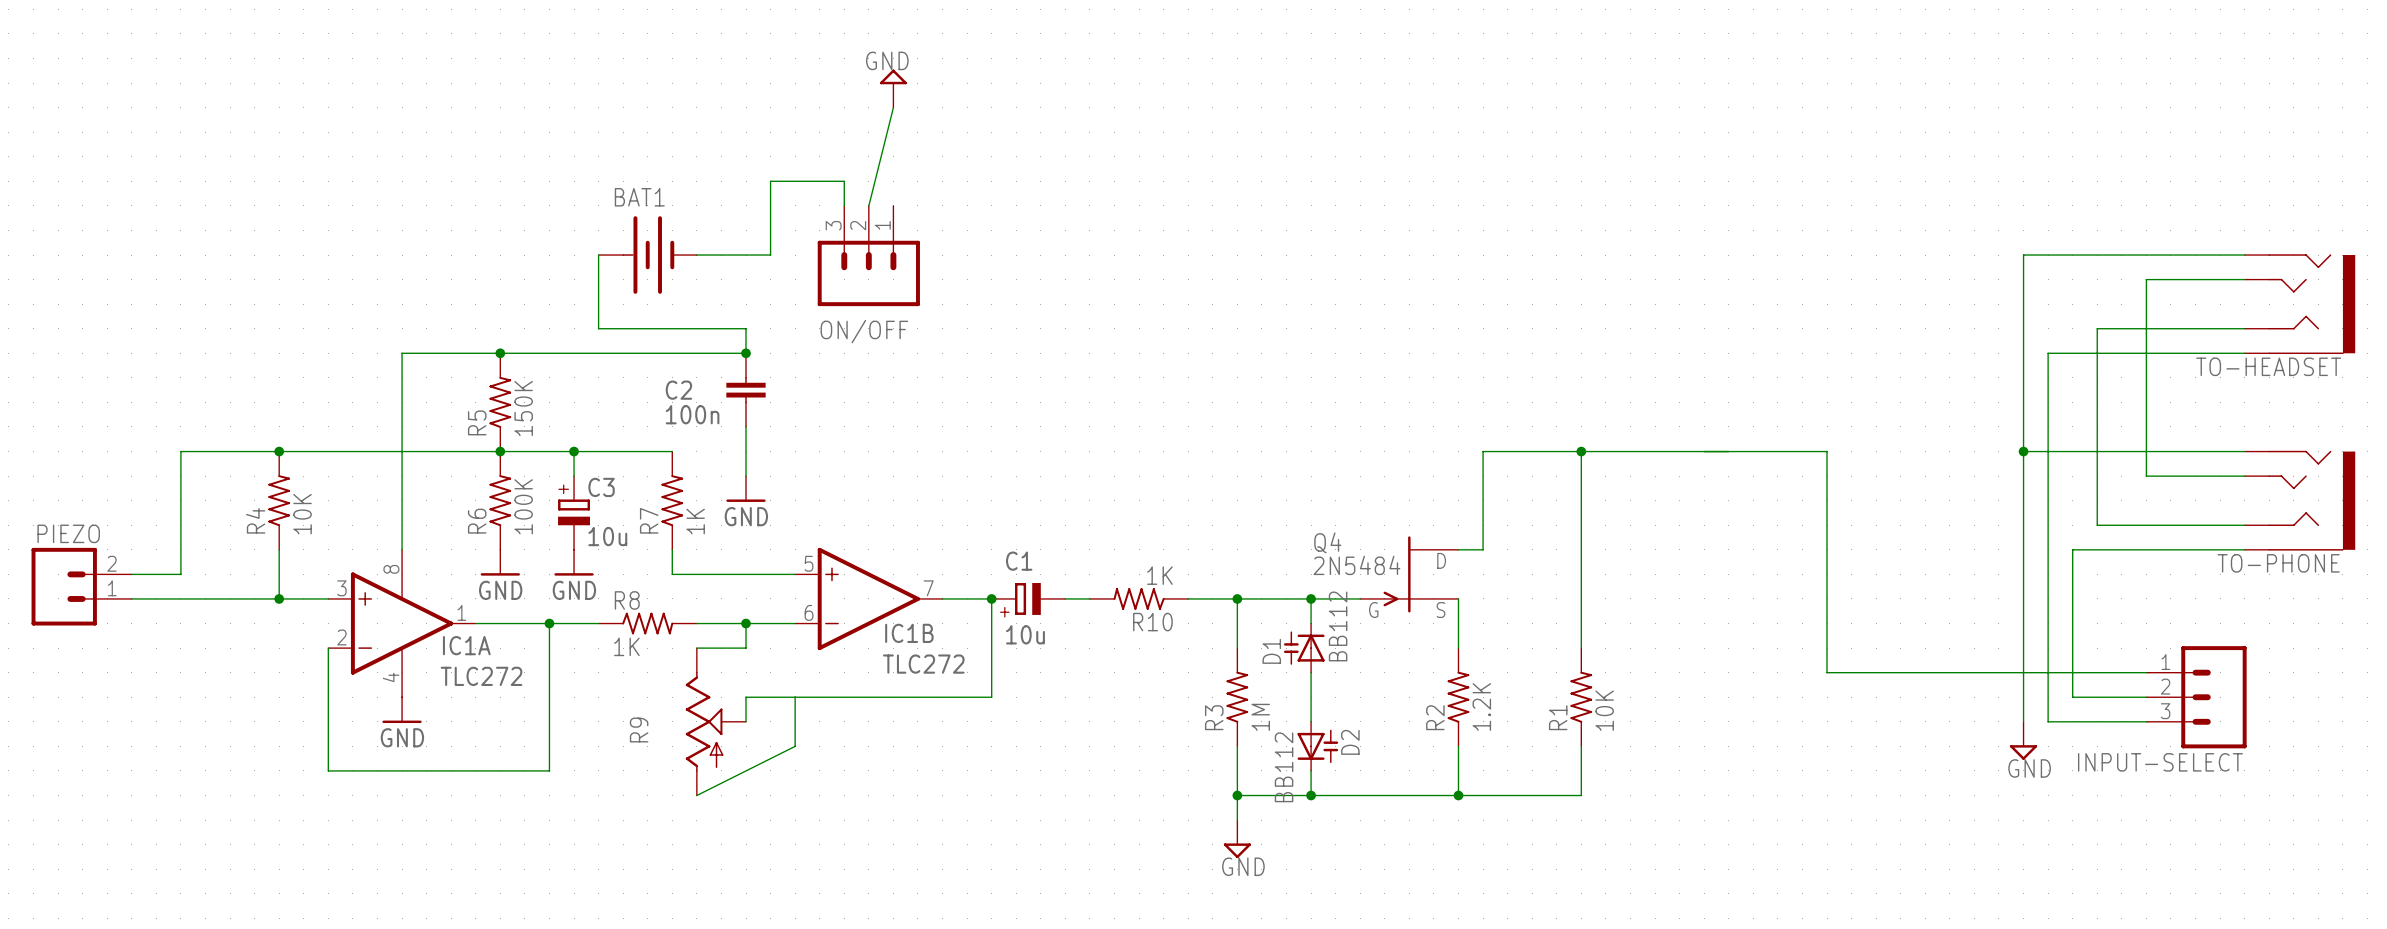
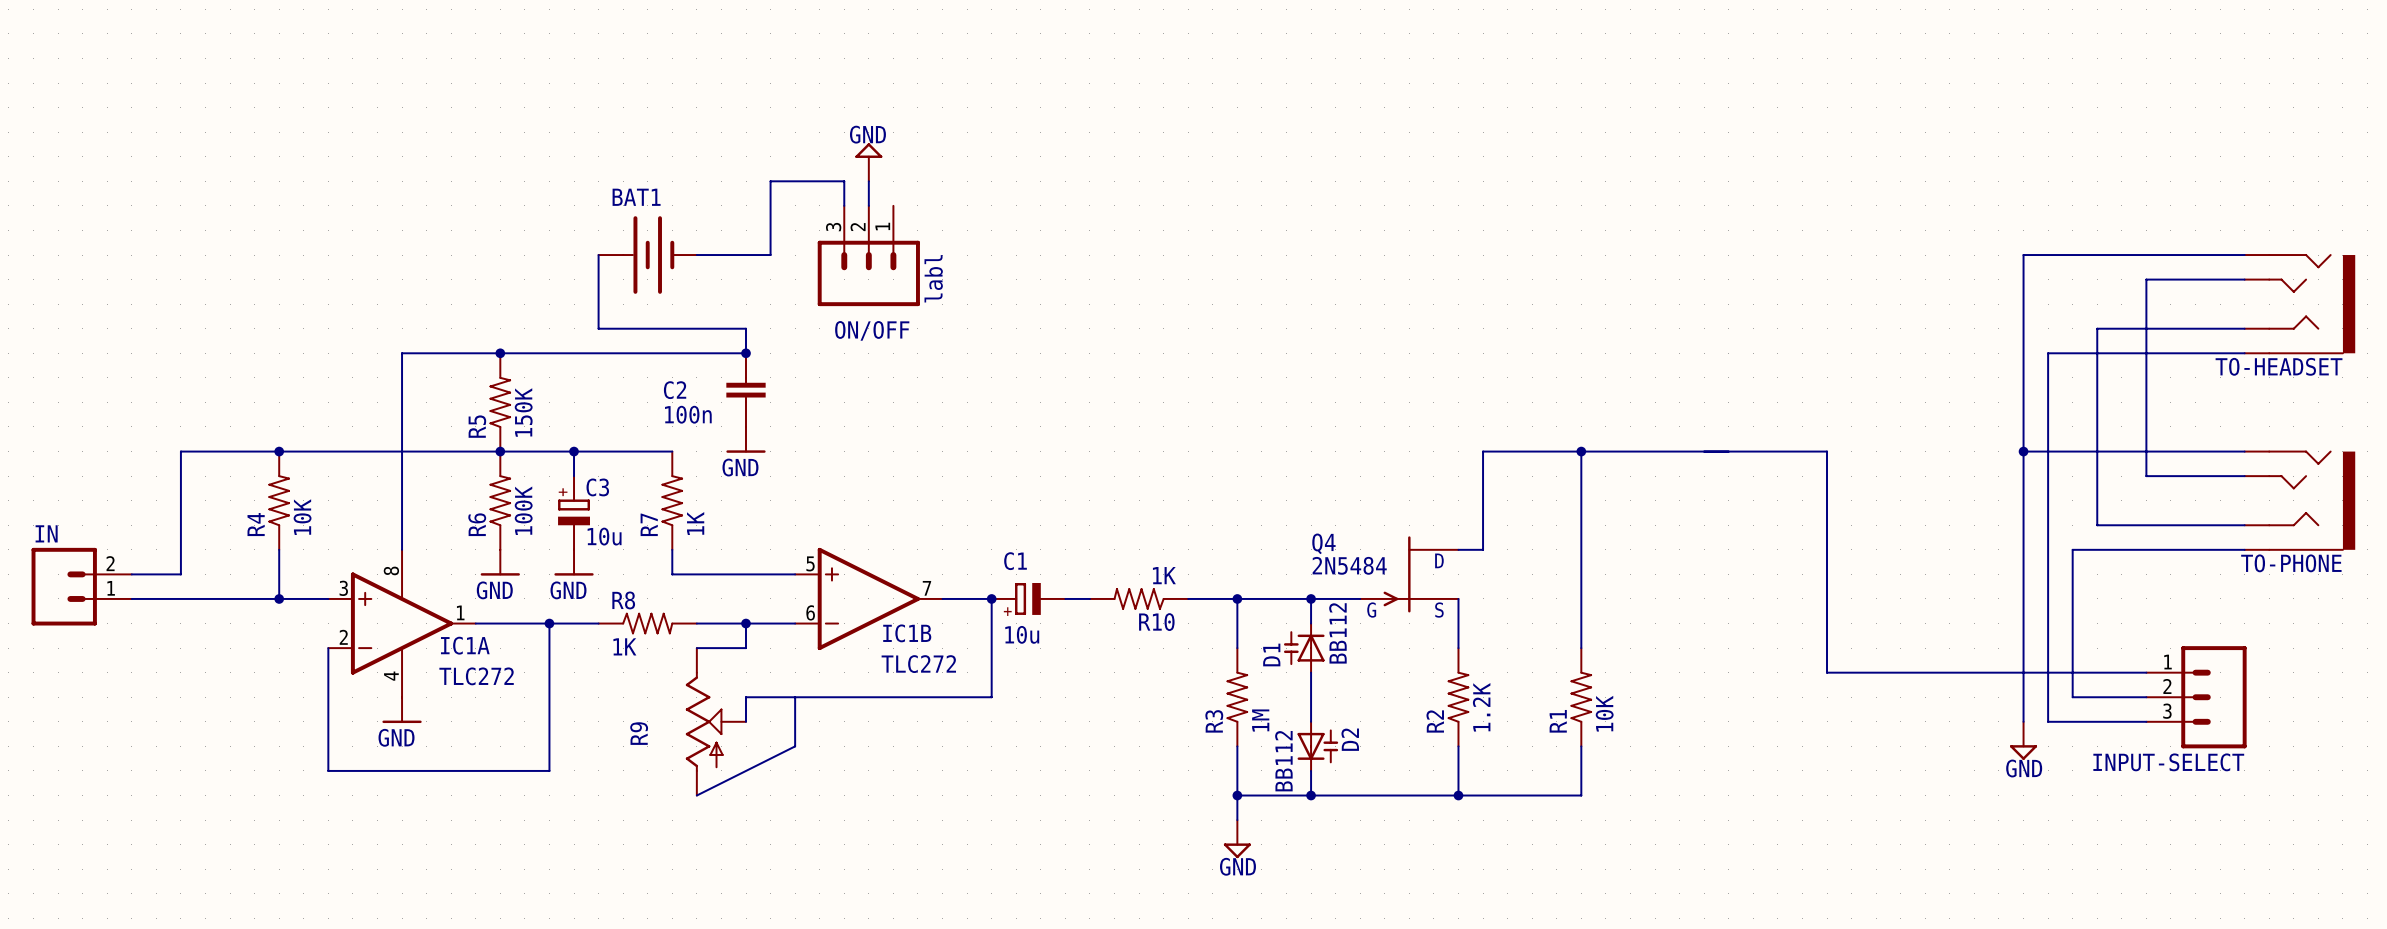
power symbol position: GND (893, 88) -> GND (868, 162)
wire: (893, 107) (868, 205) -> (868, 181) (868, 205)
ON/OFF value: none -> labl (933, 278)
power symbol position: GND (746, 489) -> GND (746, 439)
PIEZO name: PIEZO (68, 533) -> IN (46, 533)

